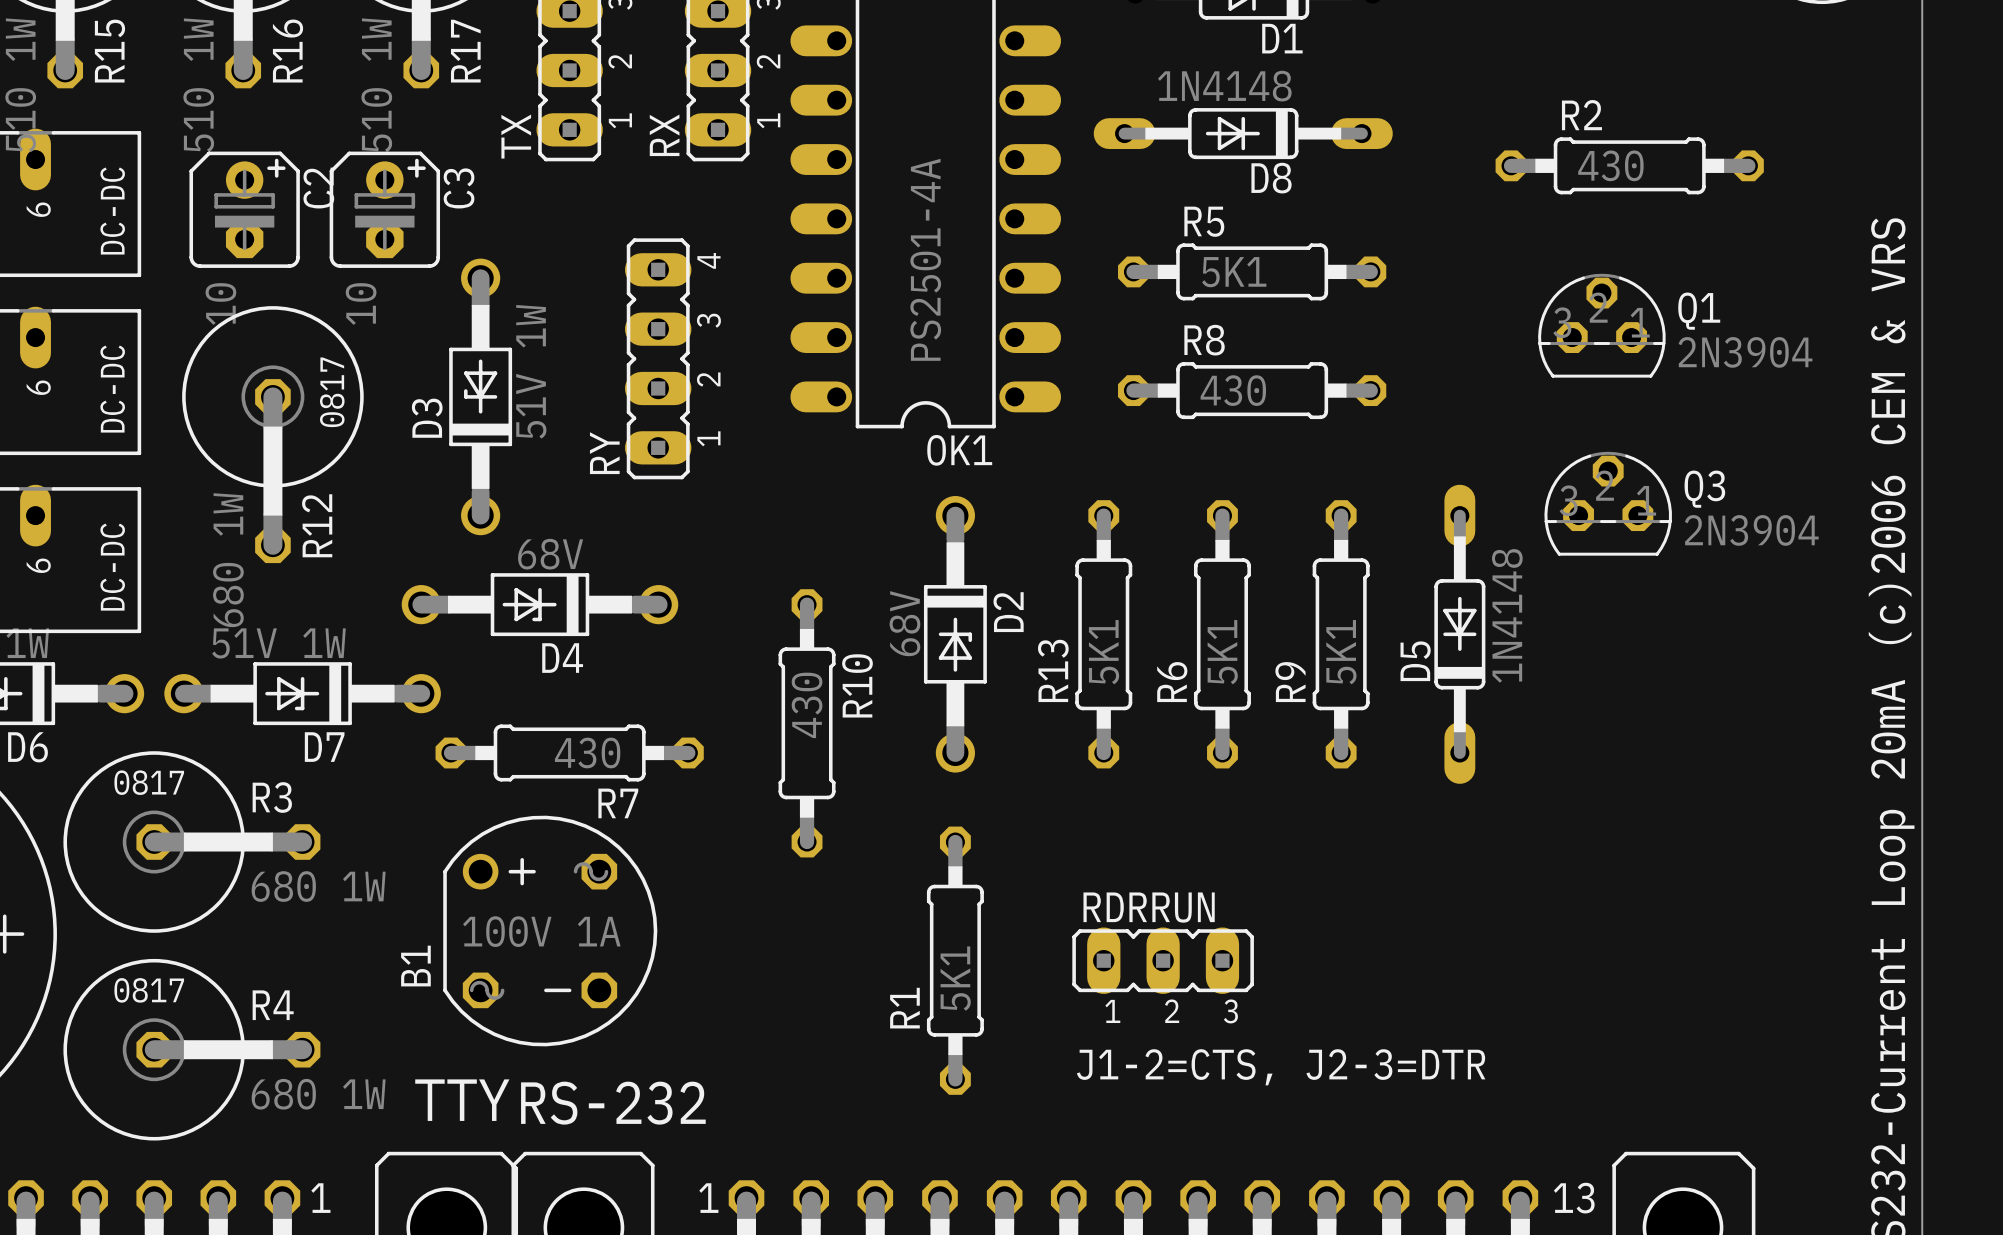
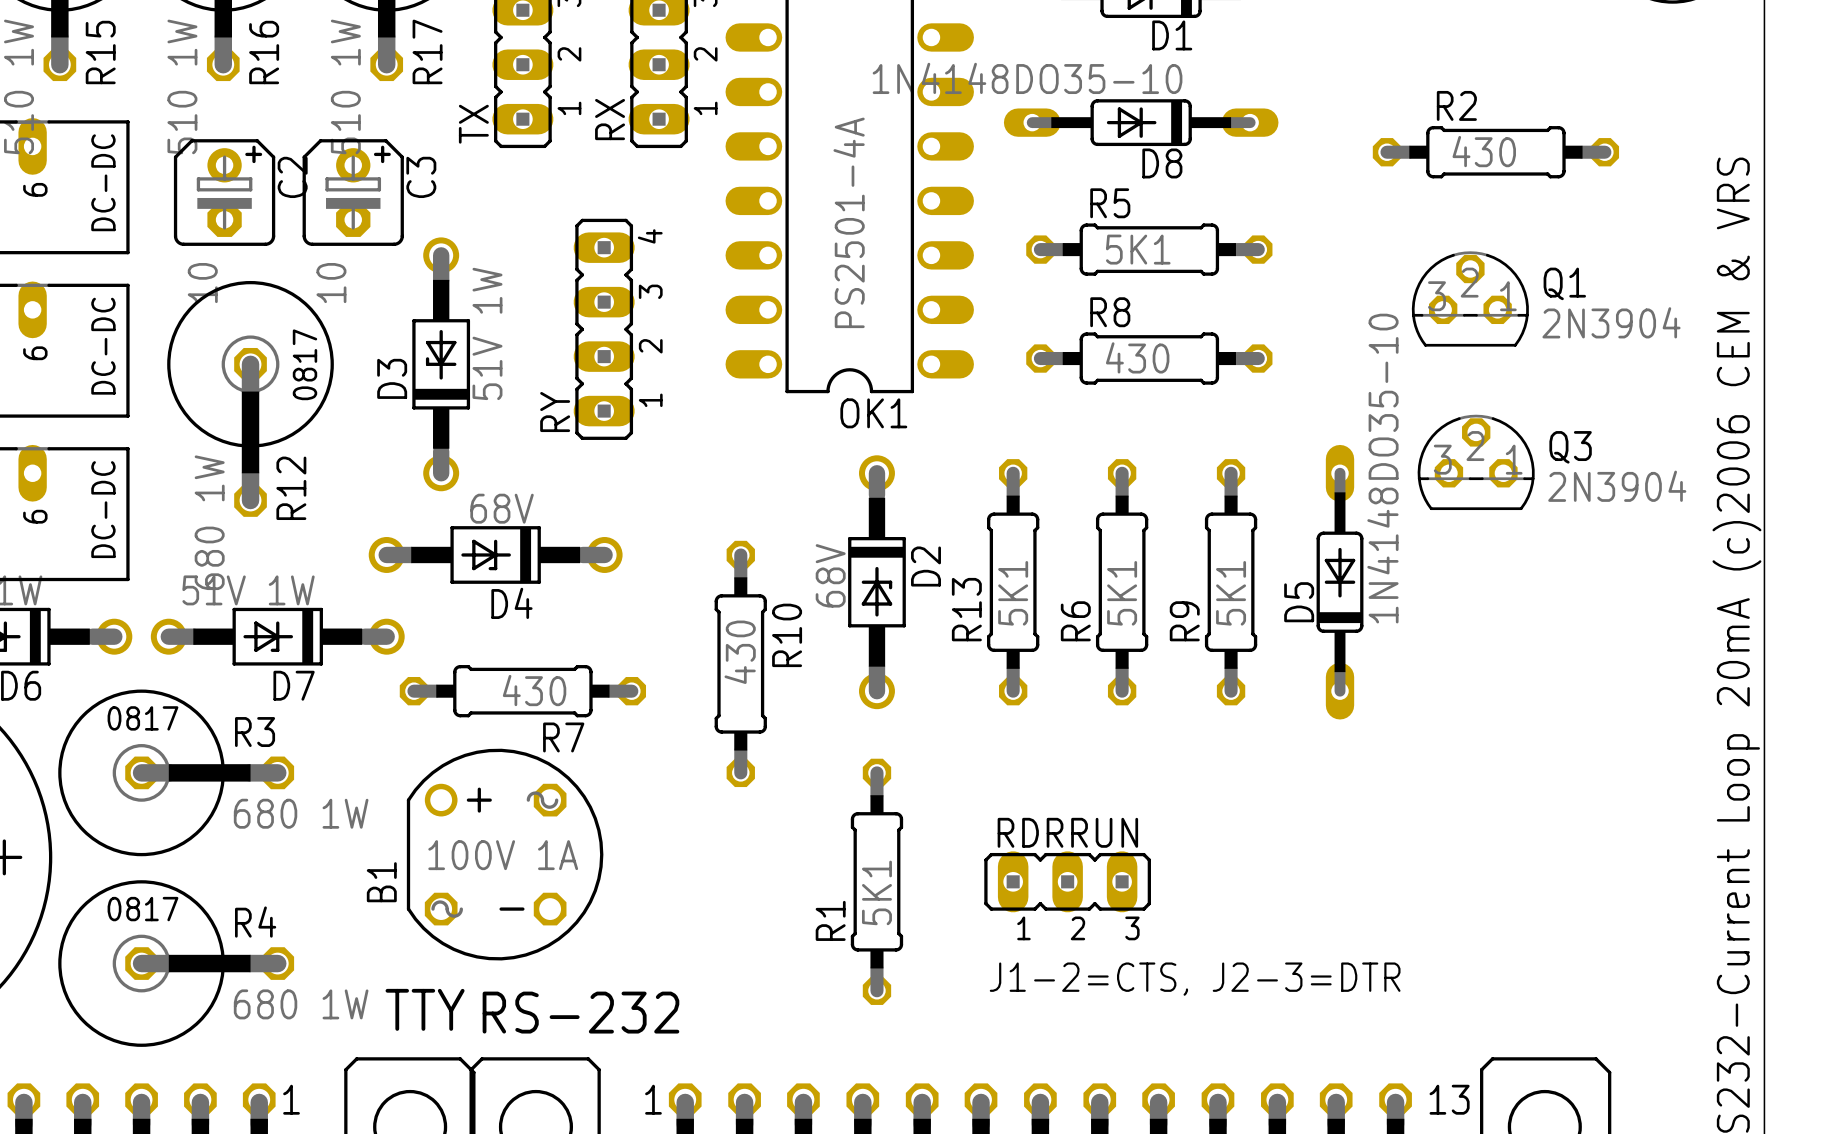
D8 value: 1N4148 (1224, 86) -> 1N4148DO35-10 (1027, 78)
D5 value: 1N4148 (1507, 615) -> 1N4148DO35-10 (1382, 468)

